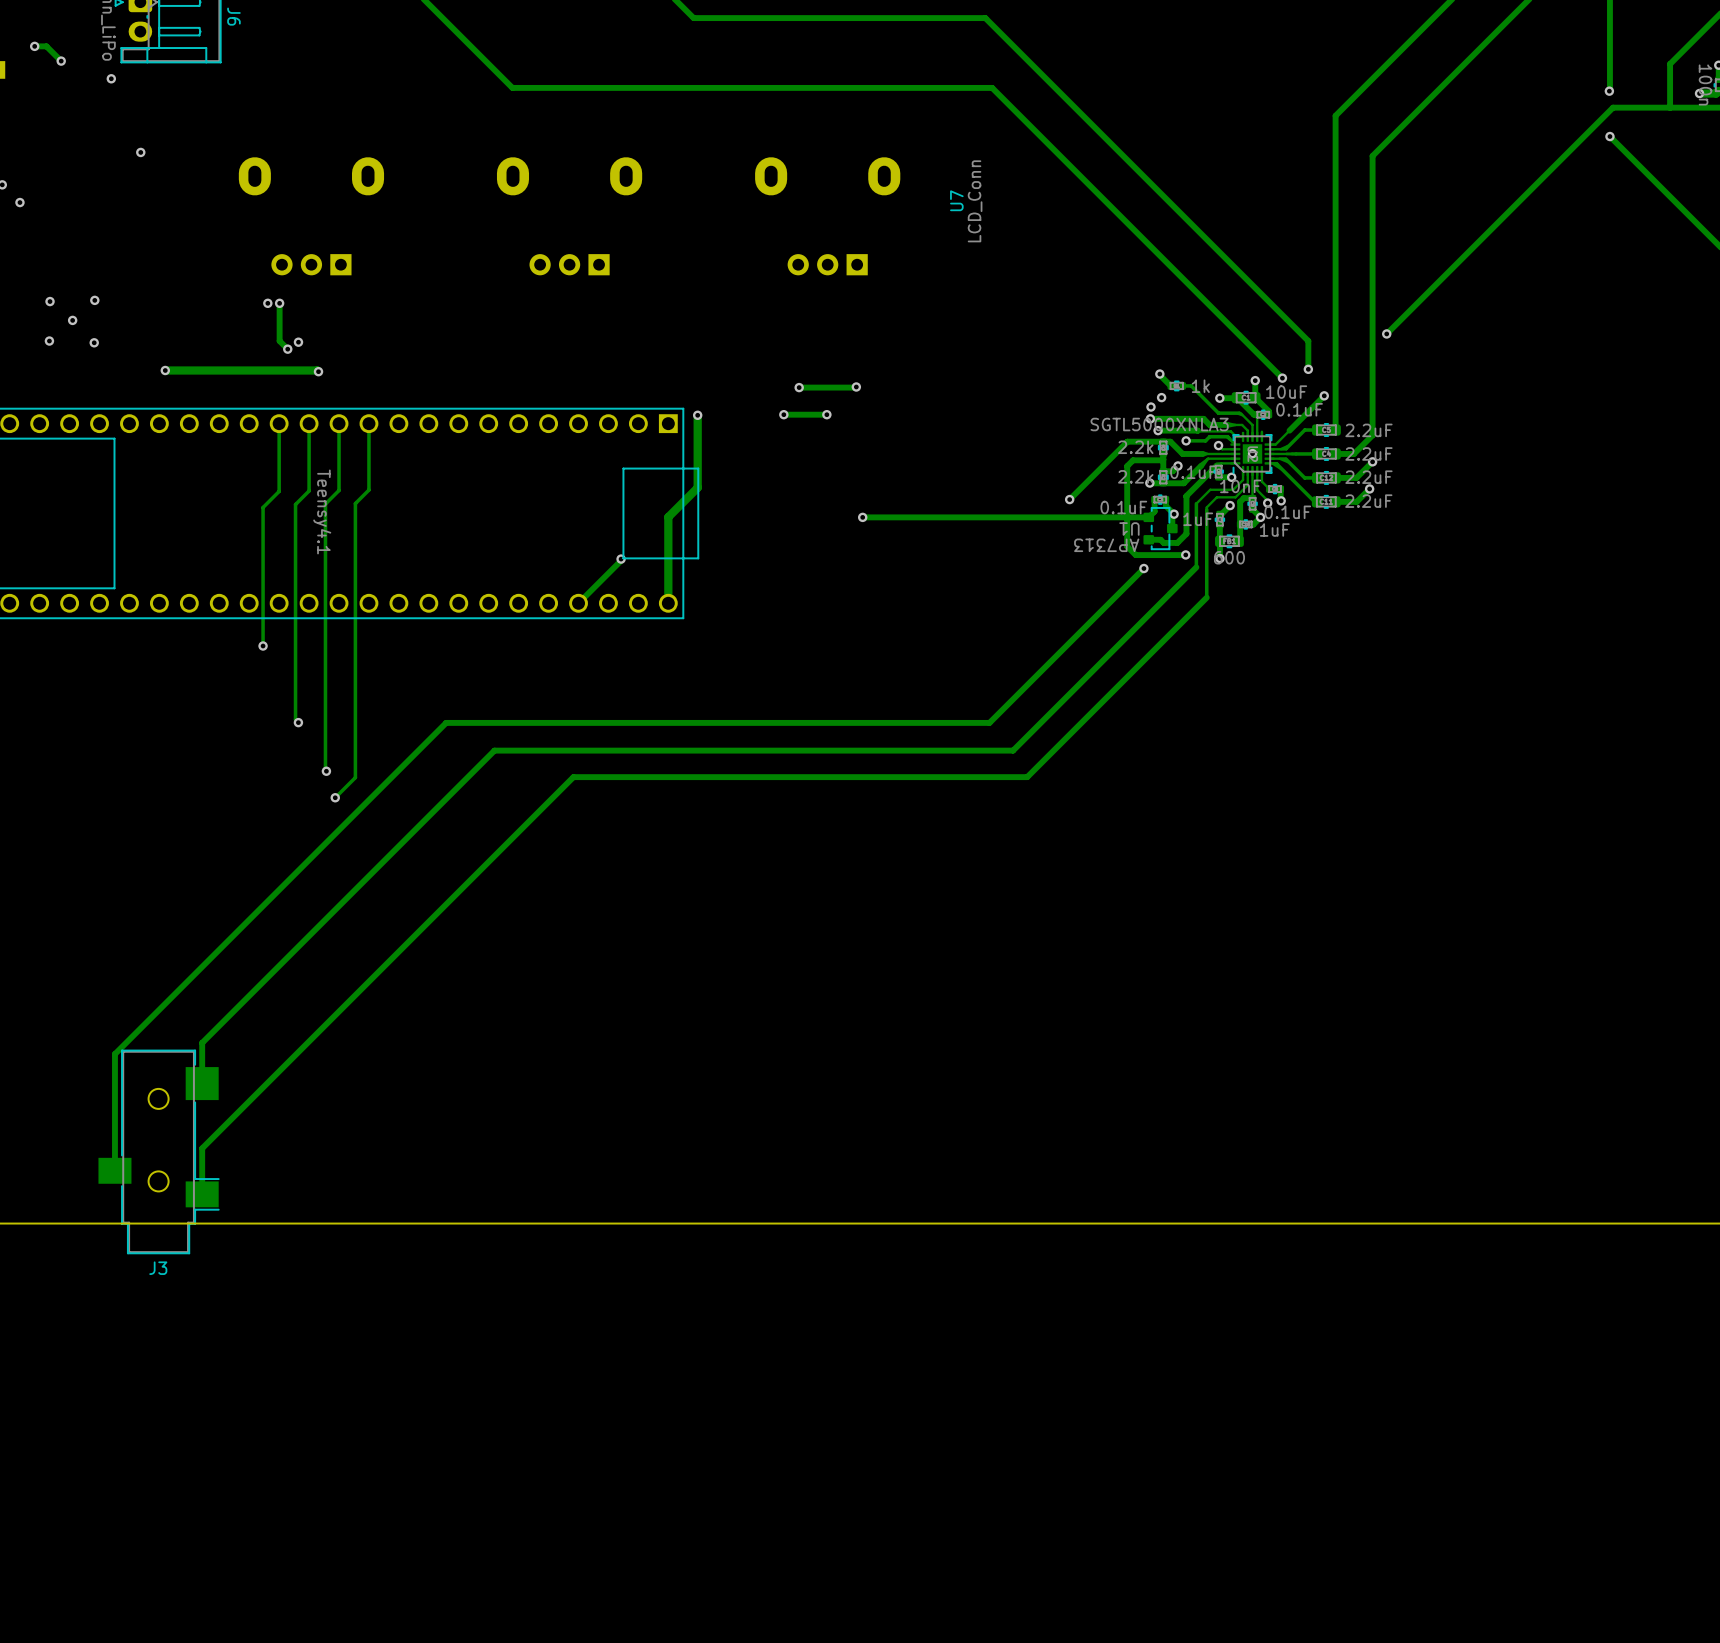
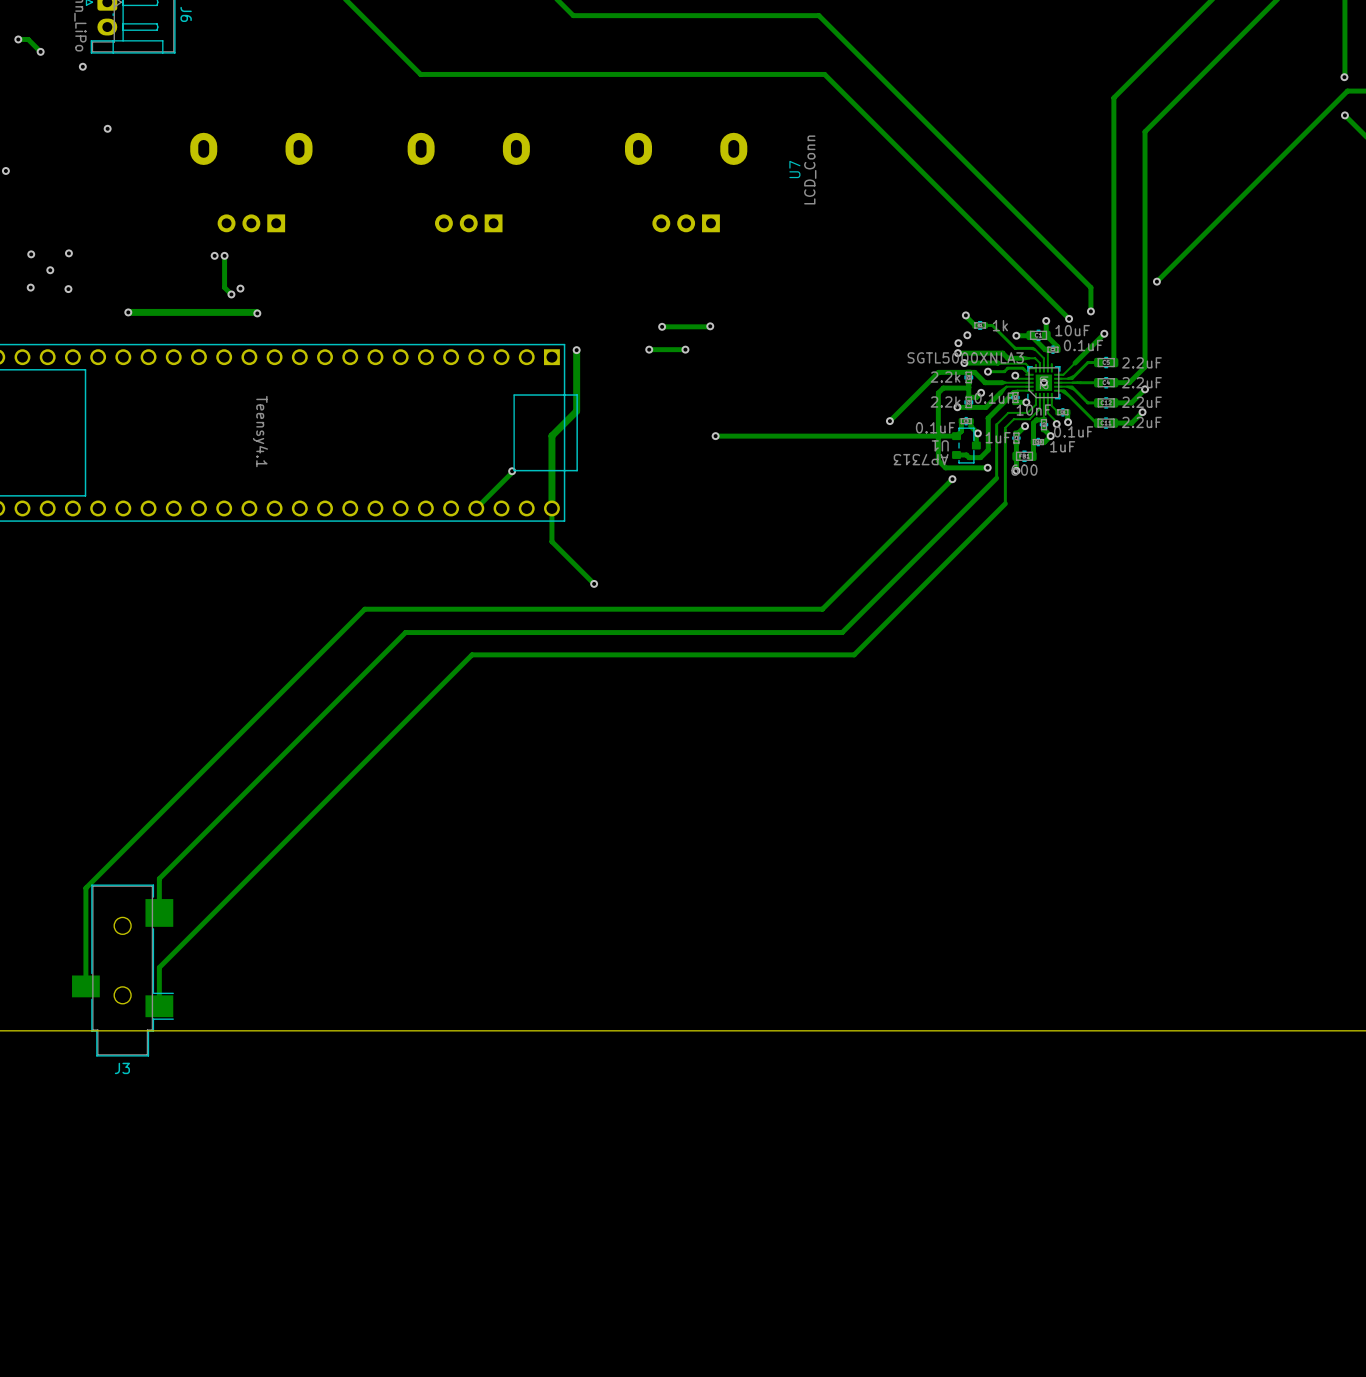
track: (279, 423) (279, 491) (263, 507) (263, 646) -> none
track: (309, 423) (309, 490) (295, 504) (295, 719) (298, 722) -> none
track: (339, 423) (339, 490) (325, 504) (326, 771) -> none
track: (368, 423) (368, 490) (355, 503) (355, 777) (335, 797) -> none
track: none -> (551, 508) (551, 541) (594, 583)
via: (263, 646) -> none
via: none -> (594, 583)
via: (298, 722) -> none
via: (326, 771) -> none
via: (335, 797) -> none

